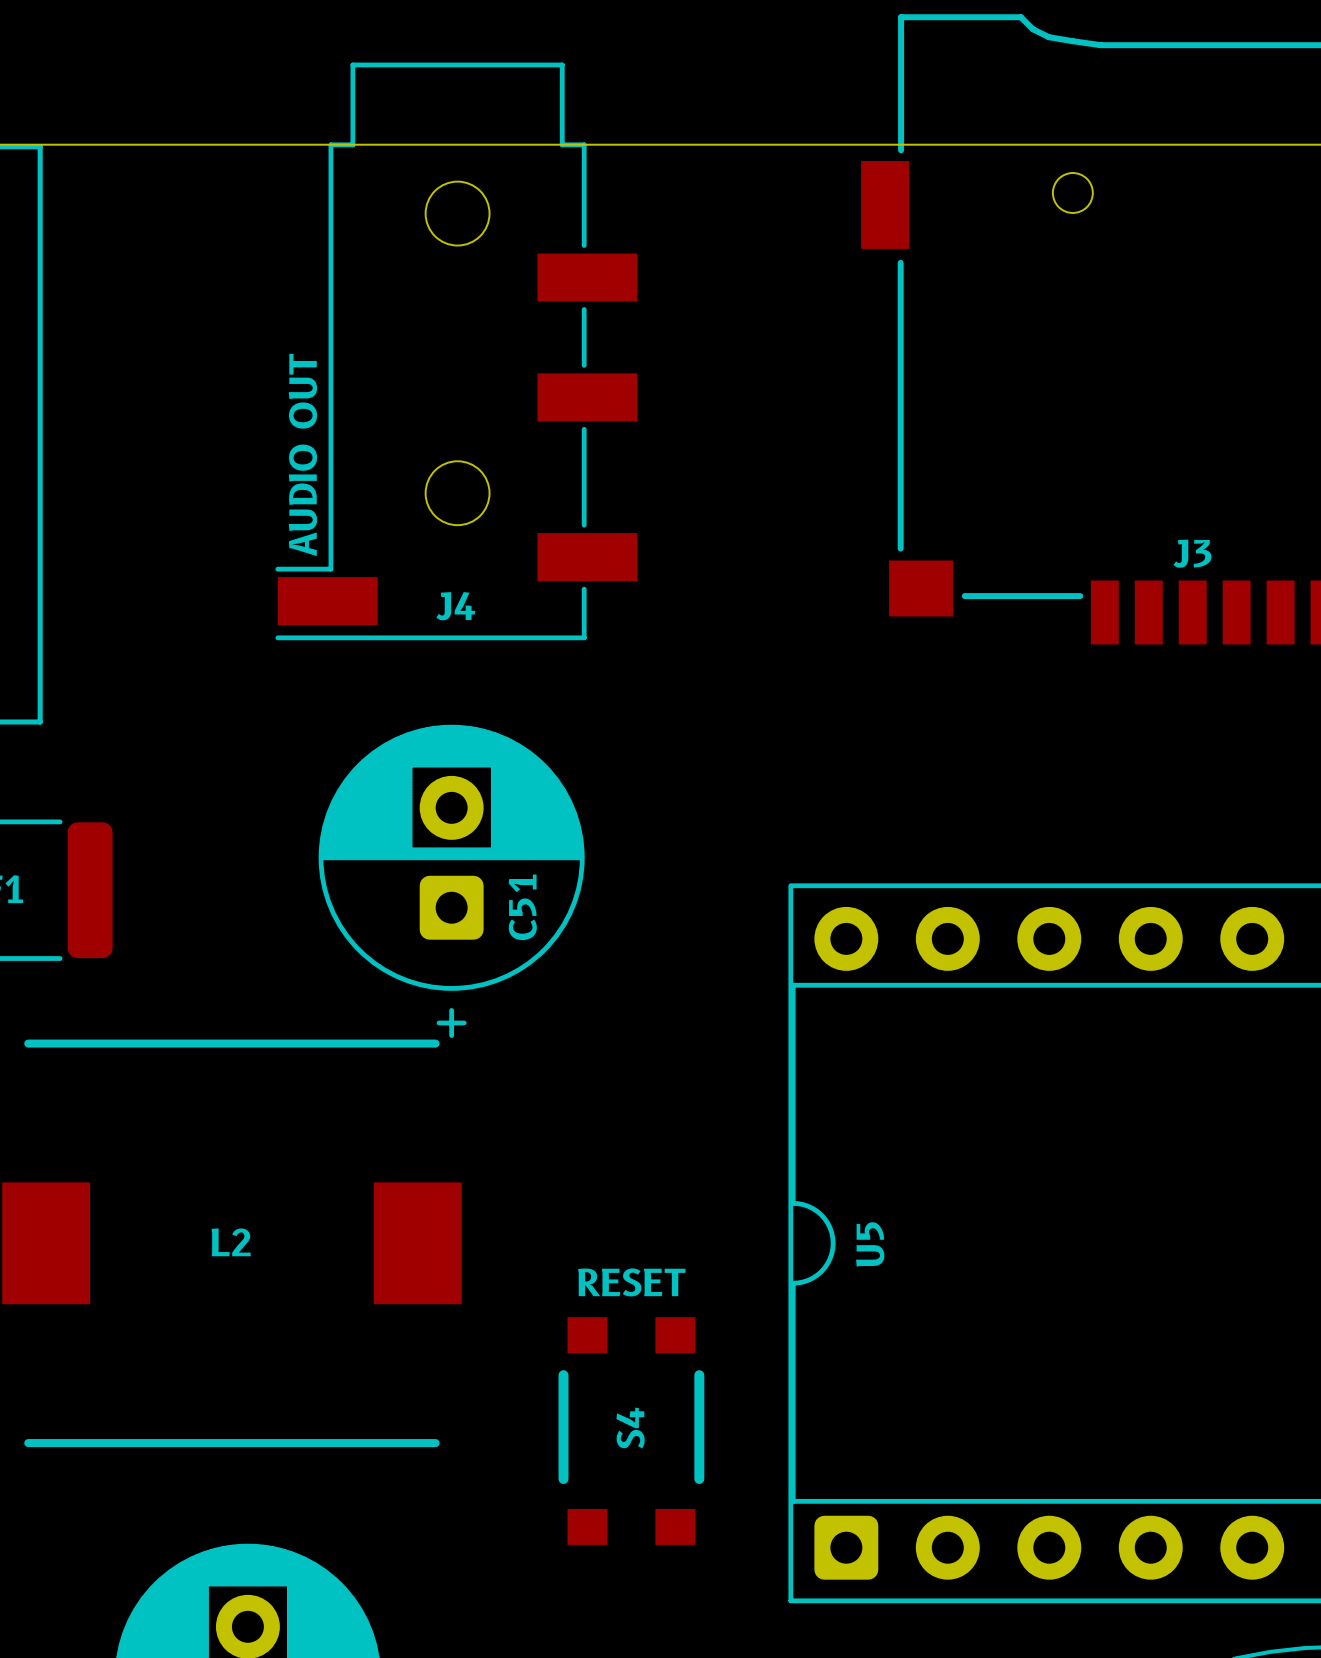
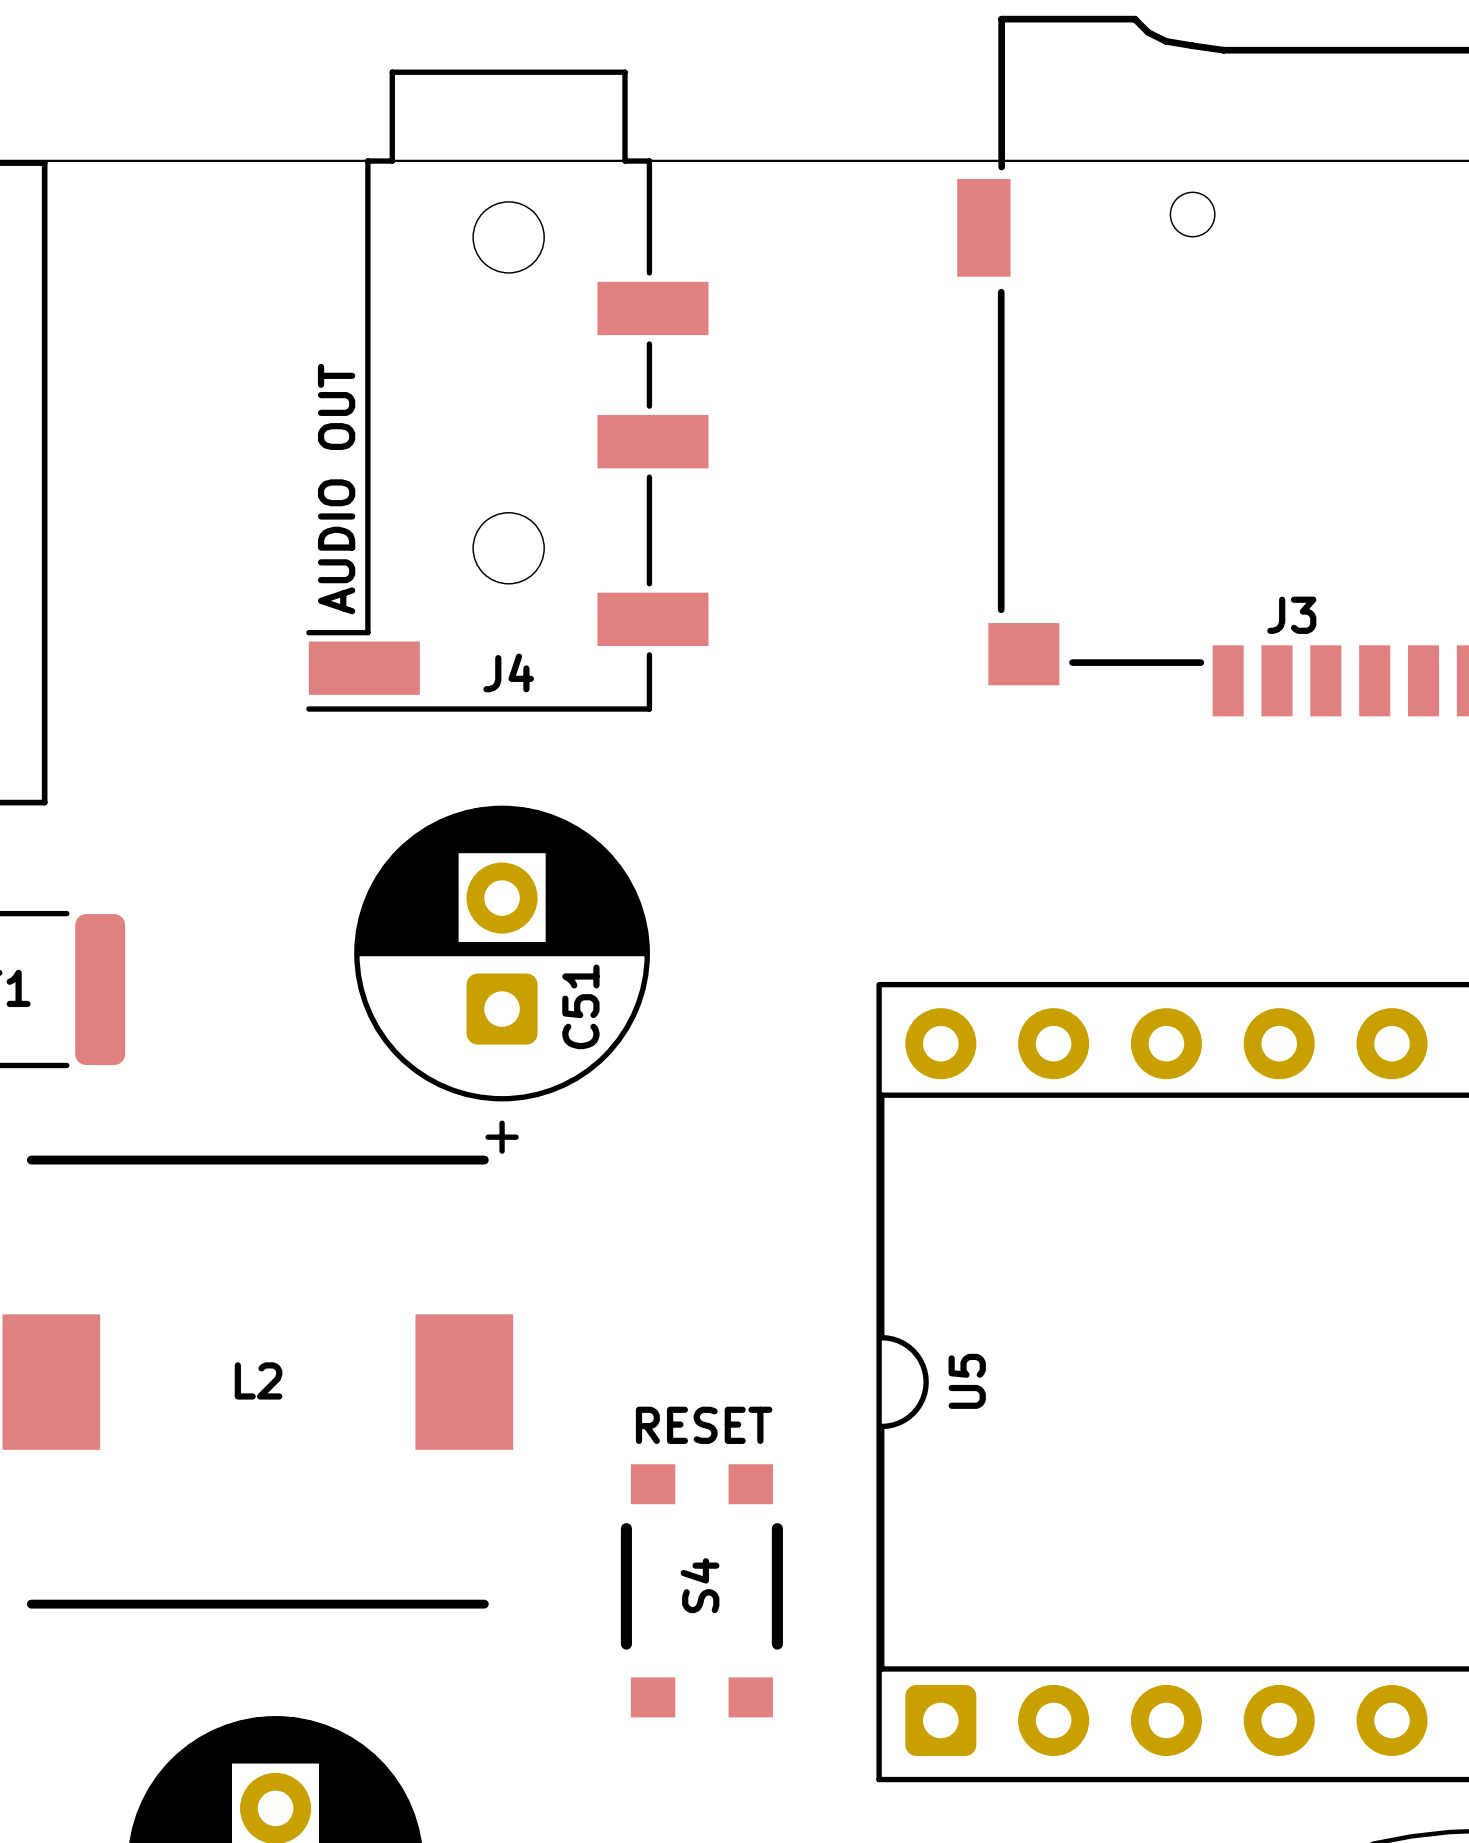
J3 name position: J3 (1192, 553) -> J3 (1291, 615)

